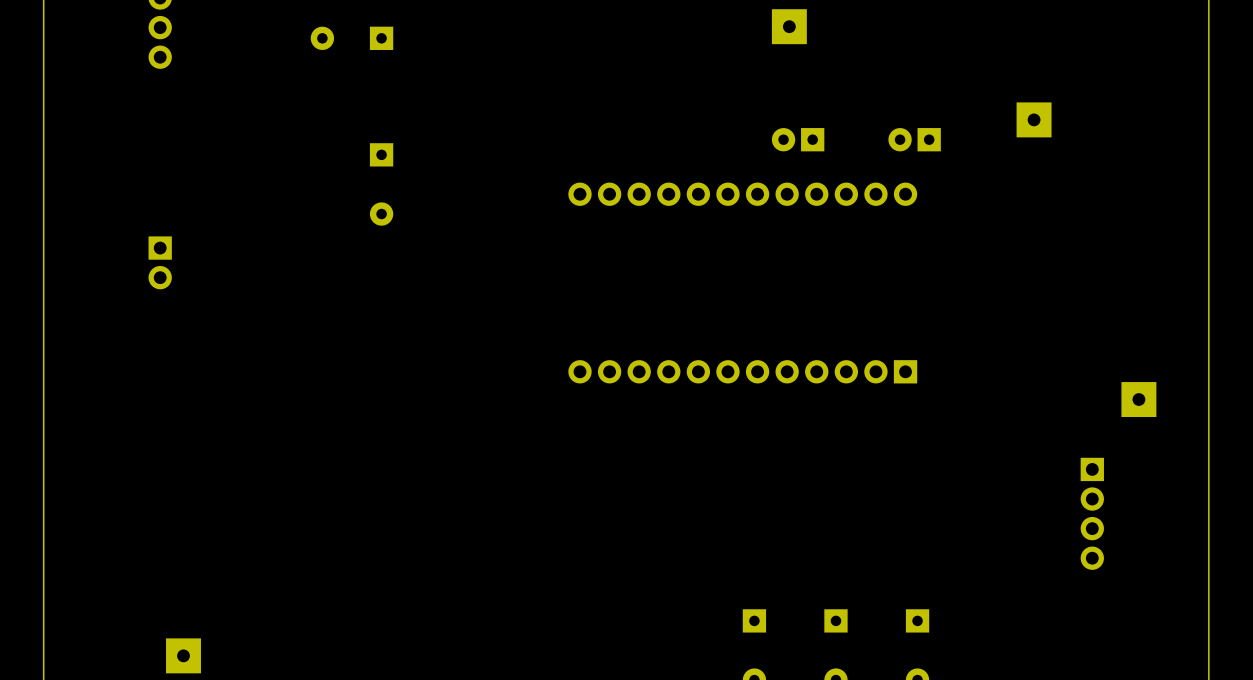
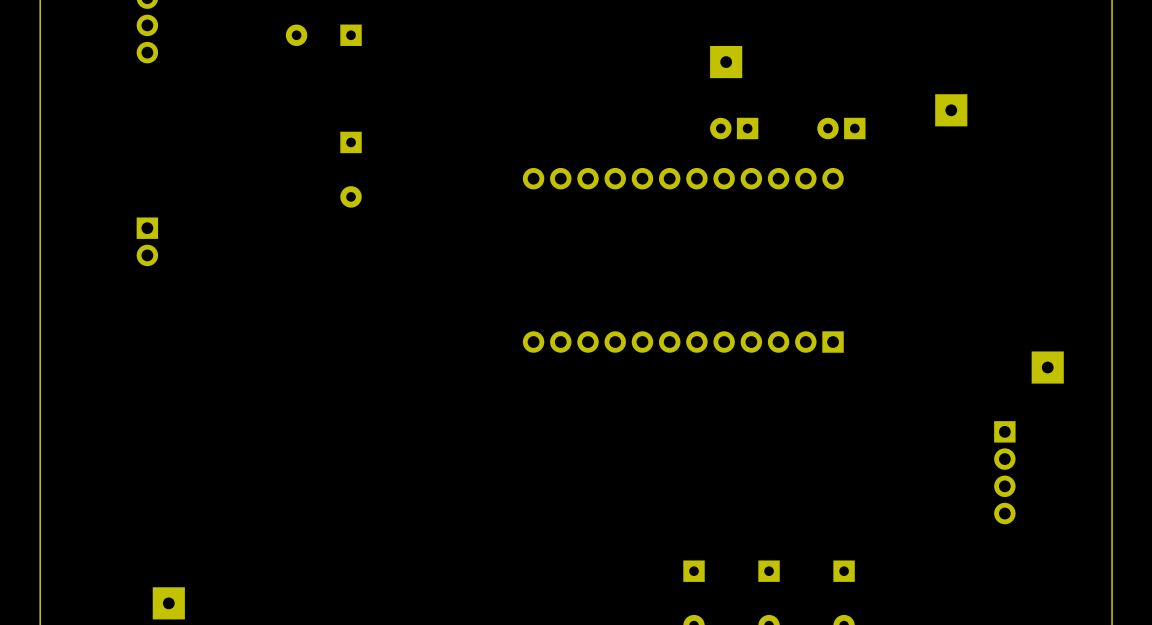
part position: (789, 26) -> (726, 62)

